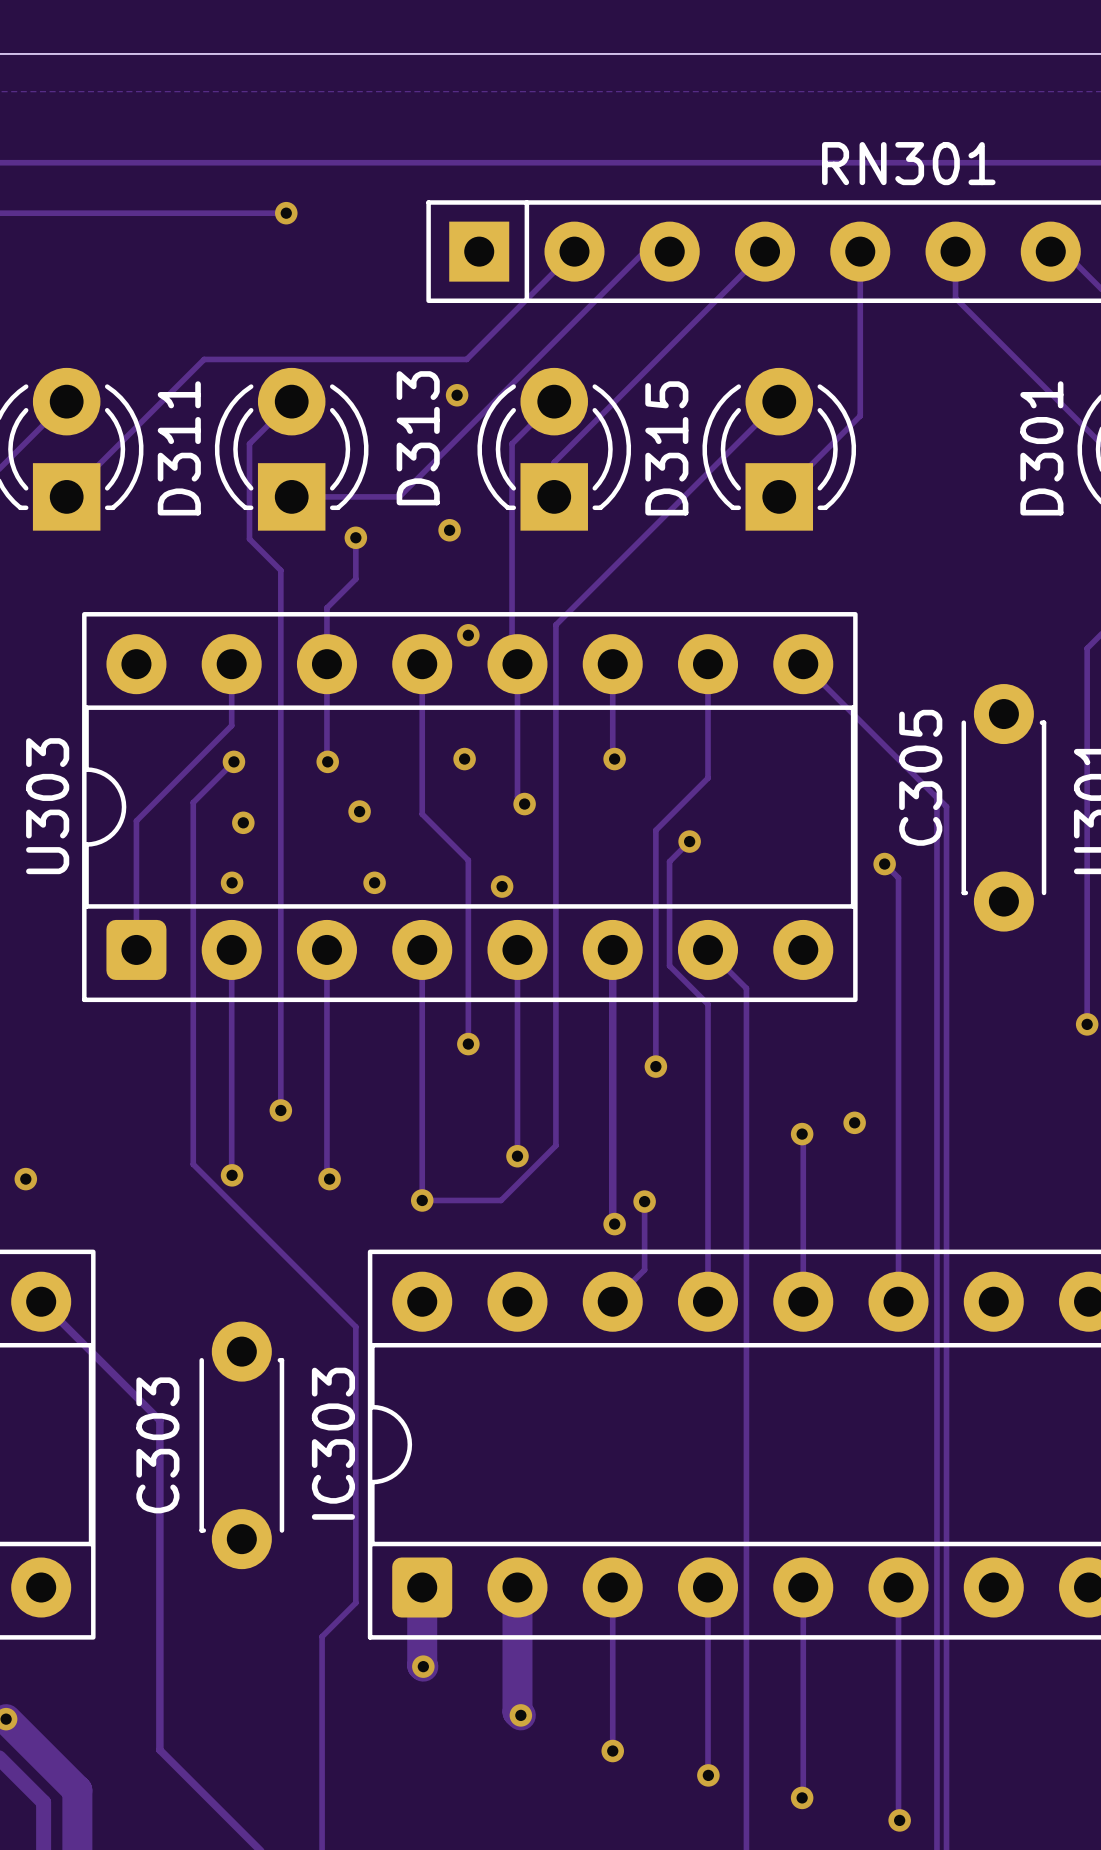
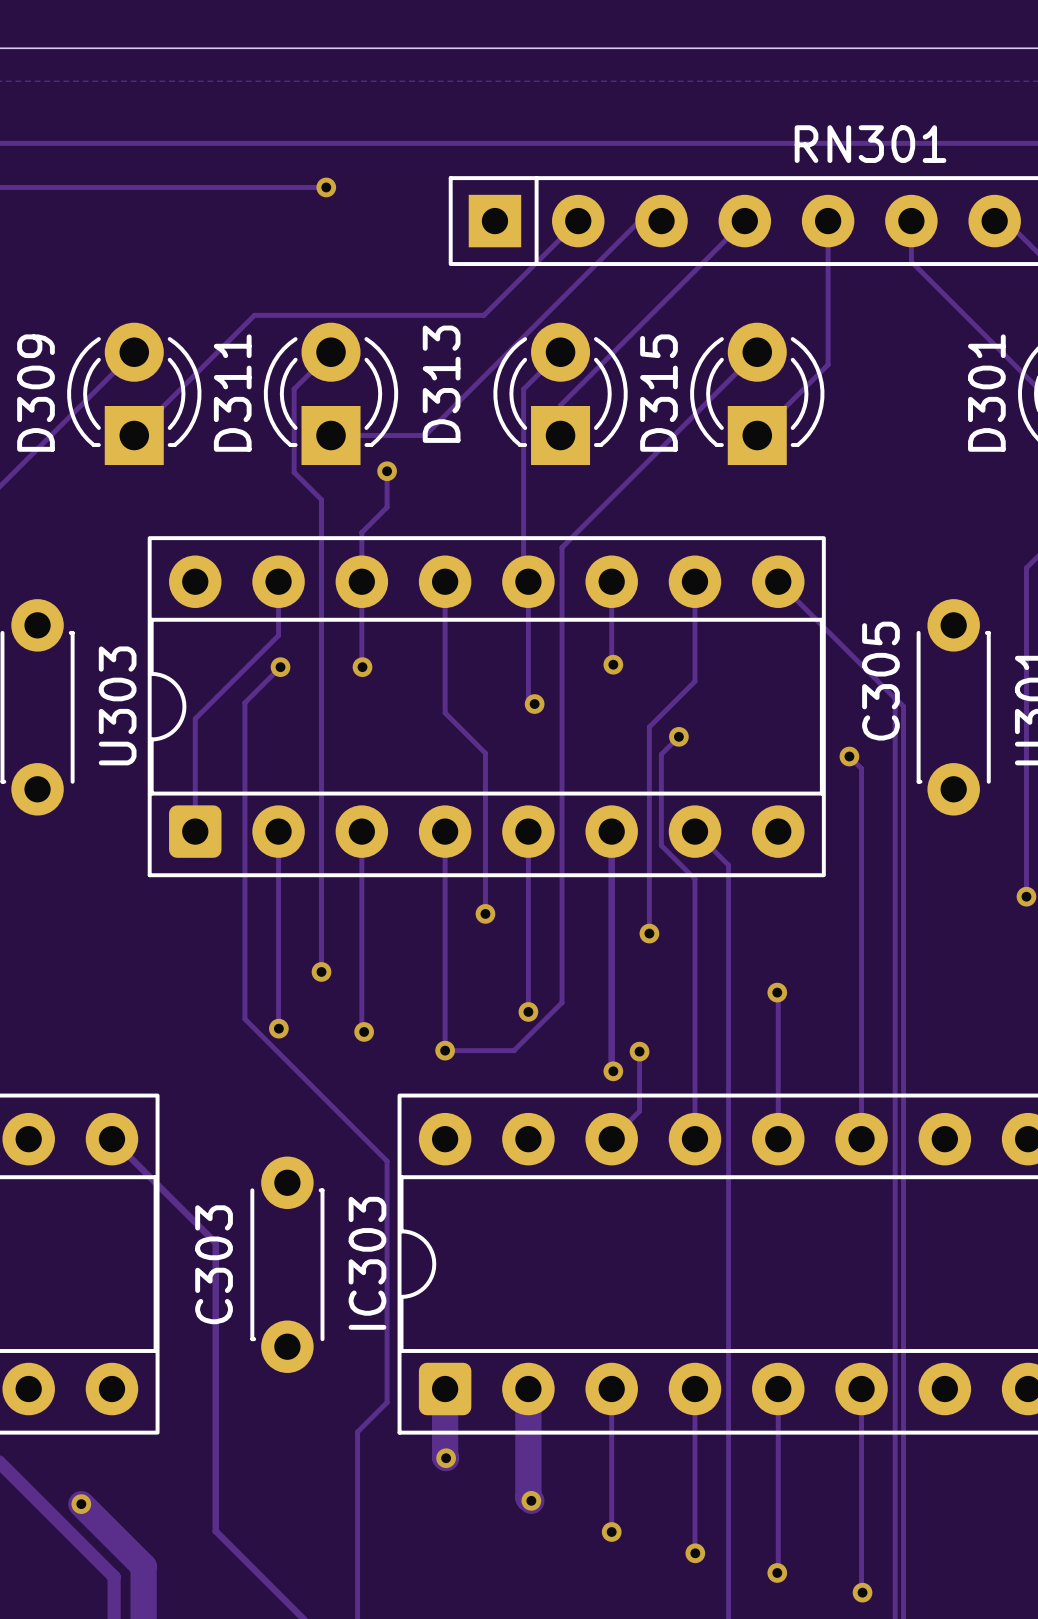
via: (457, 395) -> none
via: (449, 530) -> none
via: (468, 635) -> none
via: (464, 759) -> none
via: (359, 811) -> none
via: (243, 822) -> none
via: (232, 882) -> none
via: (374, 882) -> none
via: (502, 886) -> none
via: (854, 1122) -> none
via: (25, 1179) -> none

